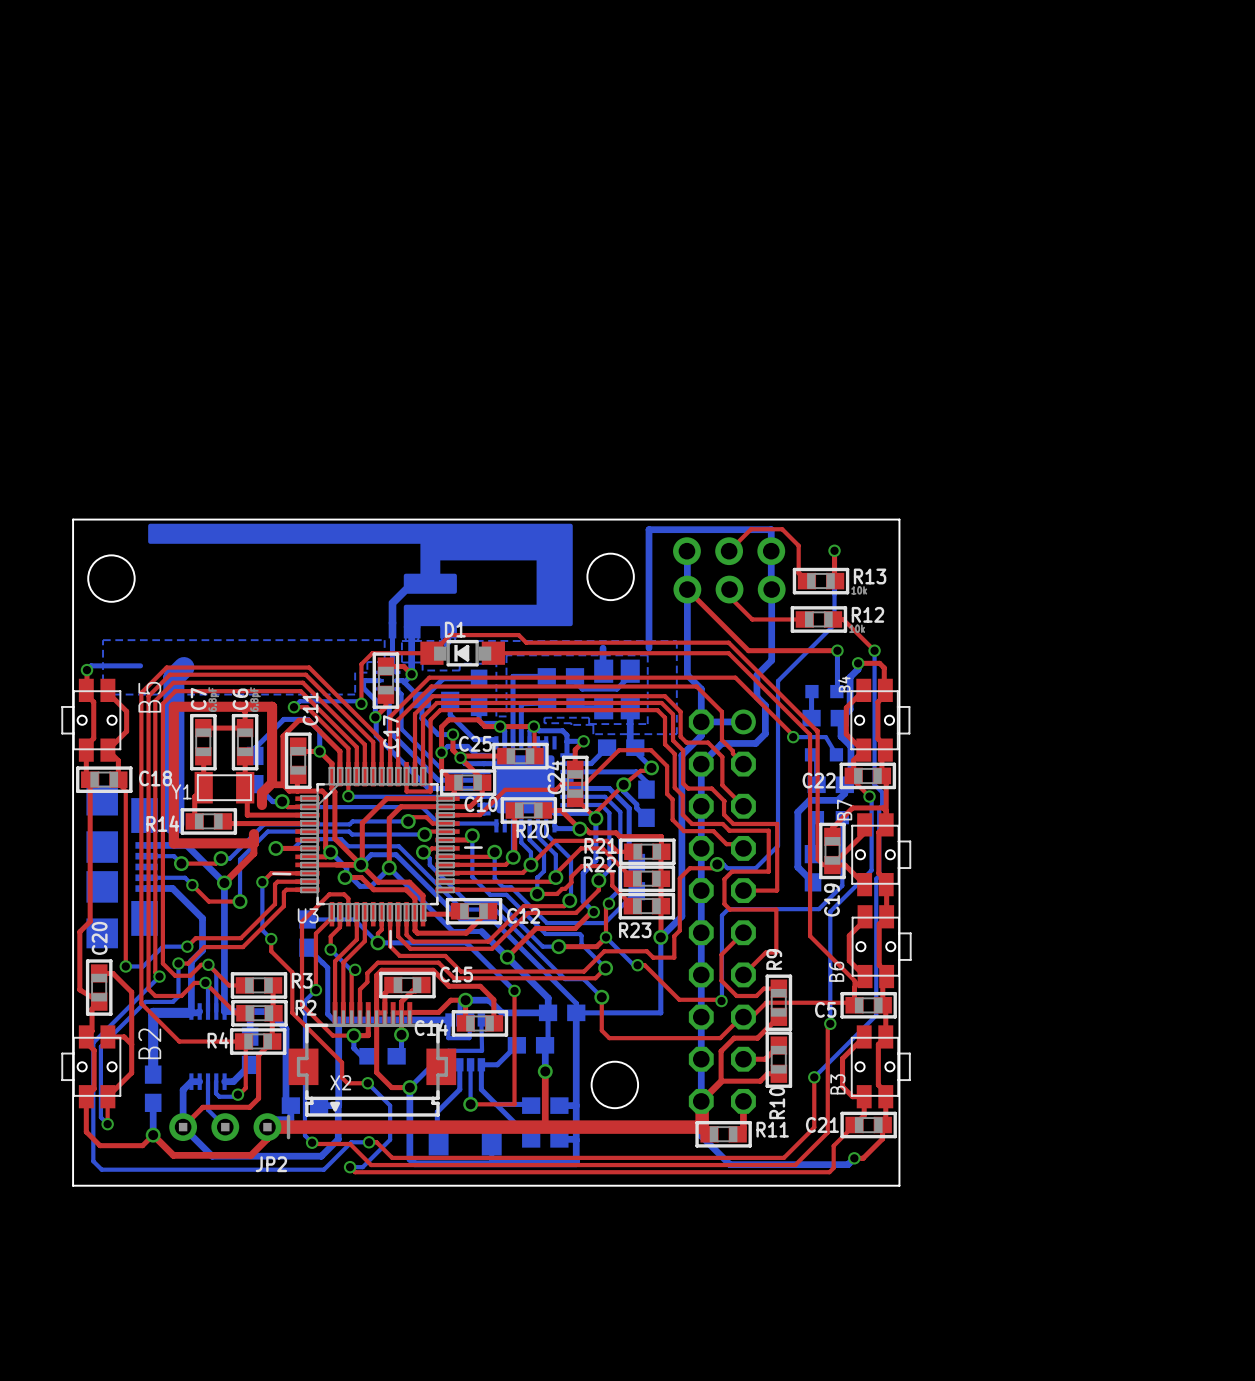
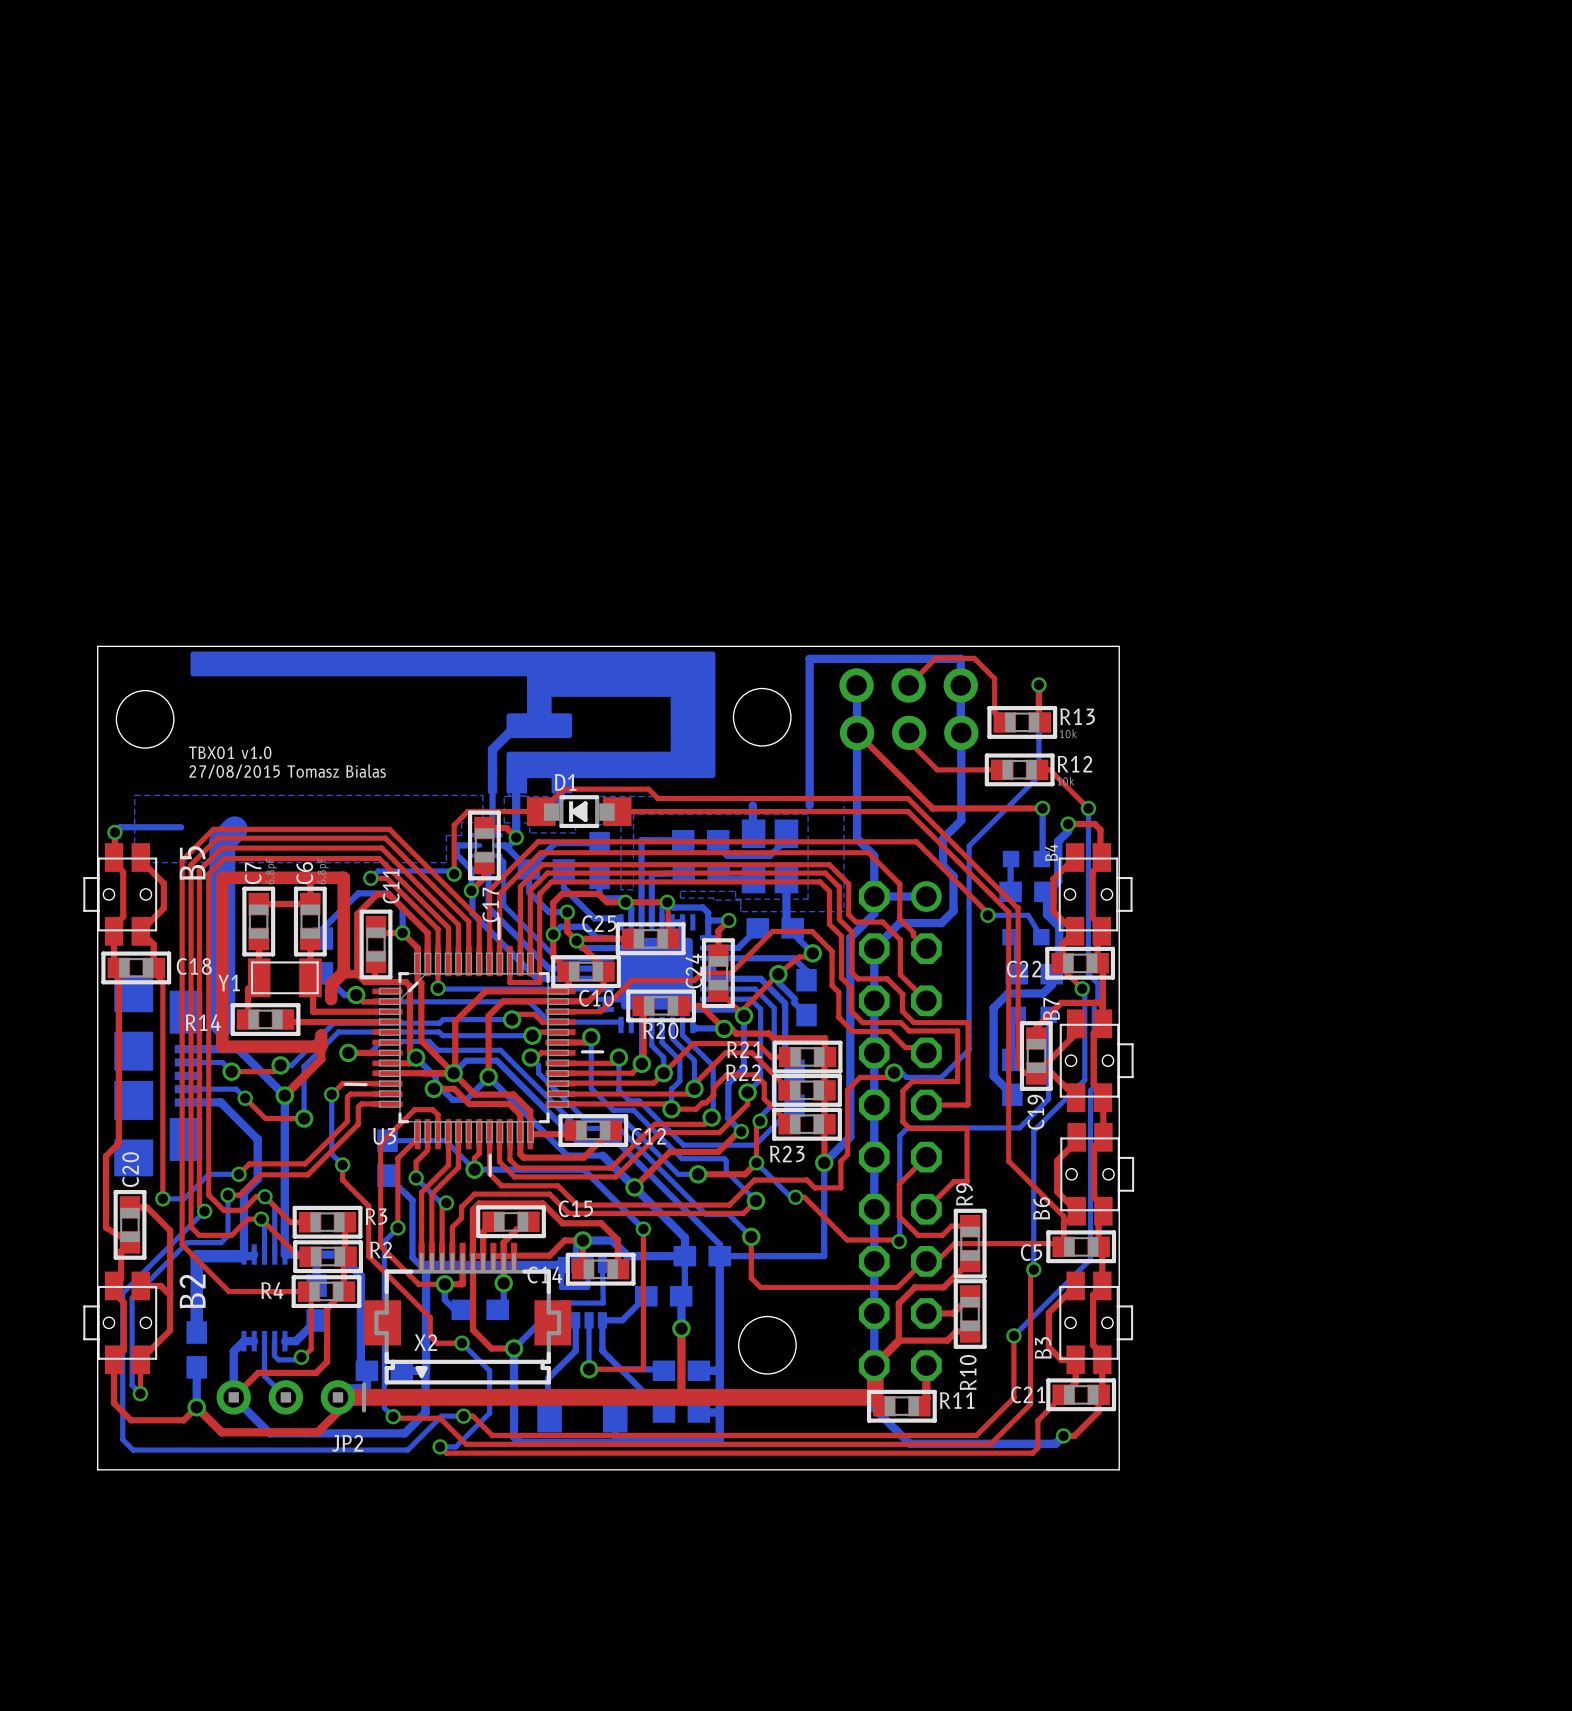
text: none -> TBX01 v1.0 (230, 752)
text: none -> 27/08/2015 Tomasz Bialas (287, 771)

